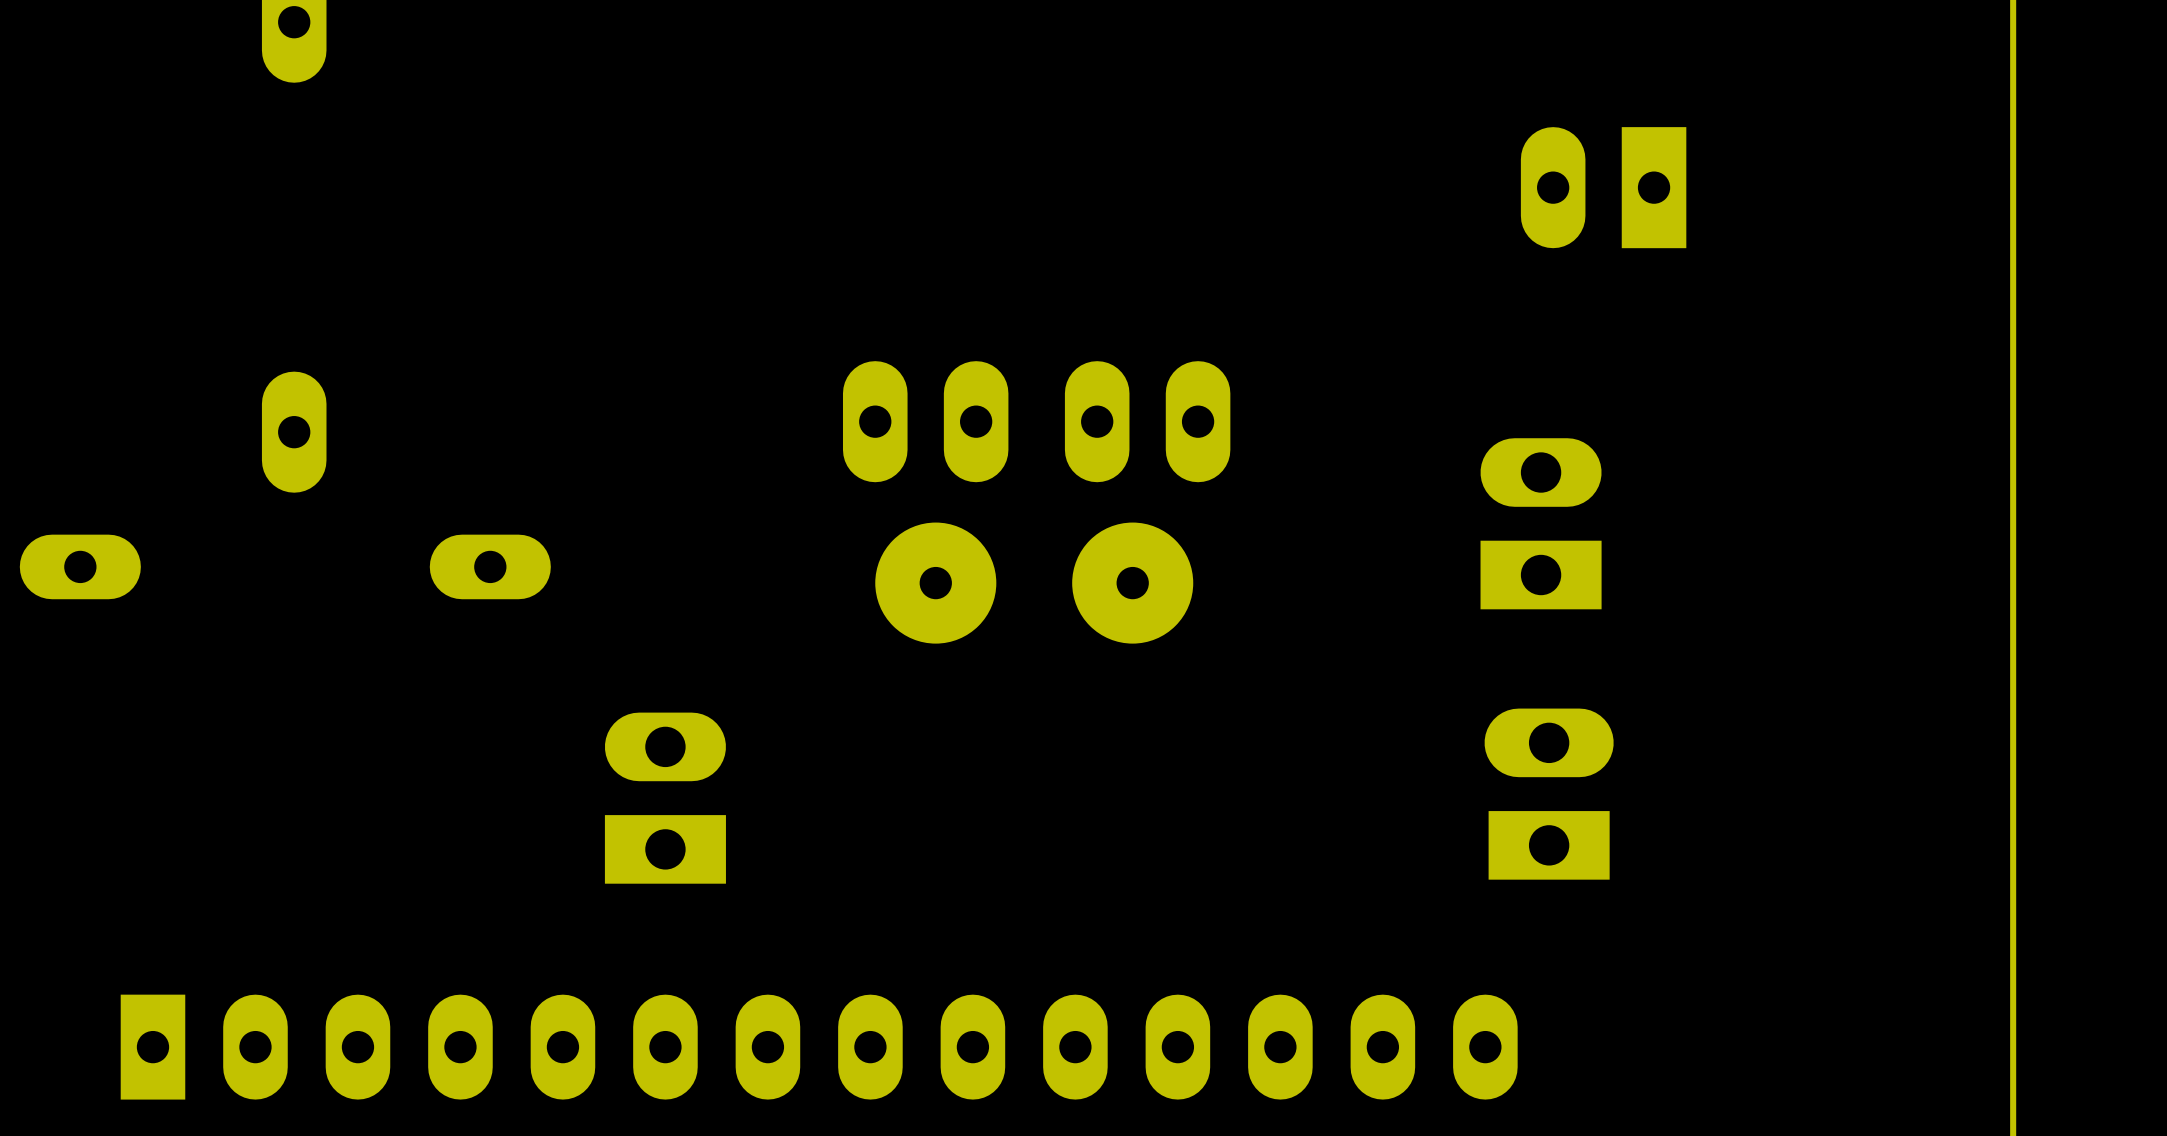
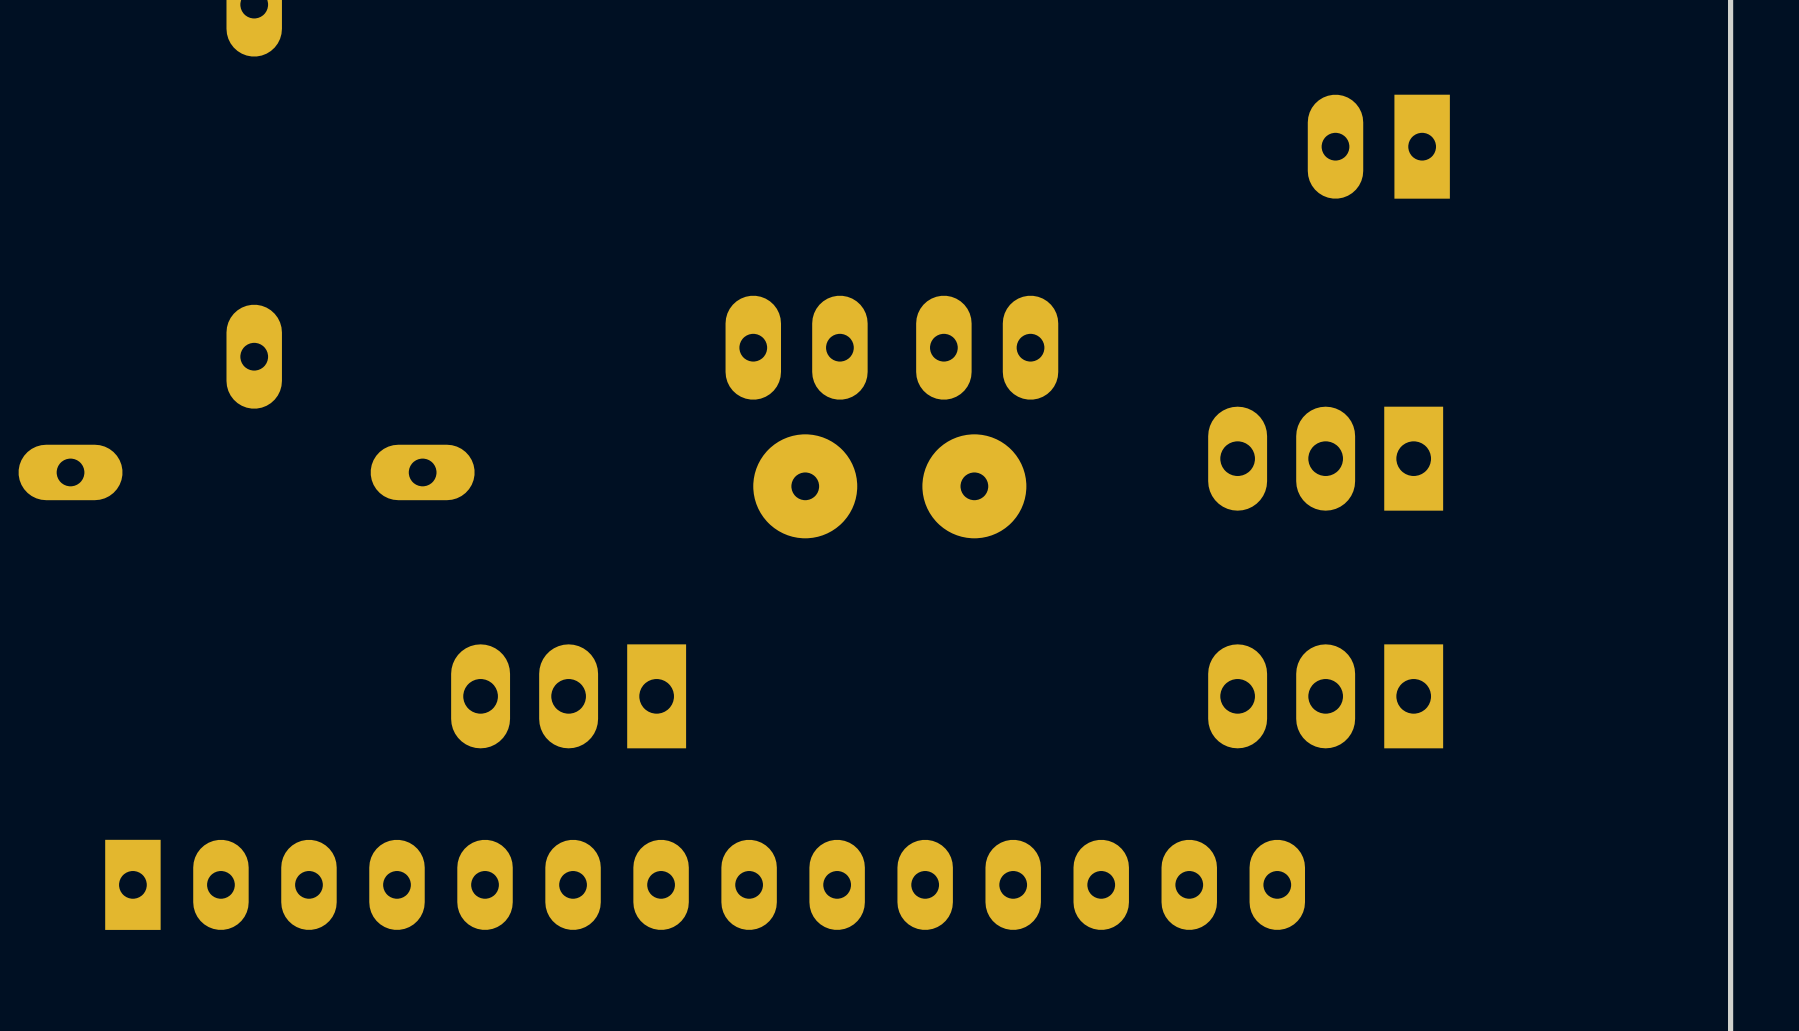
part footprint: [1480, 438, 1602, 610] -> [1208, 406, 1444, 511]
part footprint: [1484, 708, 1614, 880] -> [1208, 644, 1444, 749]
part footprint: [604, 712, 726, 884] -> [451, 644, 687, 749]

